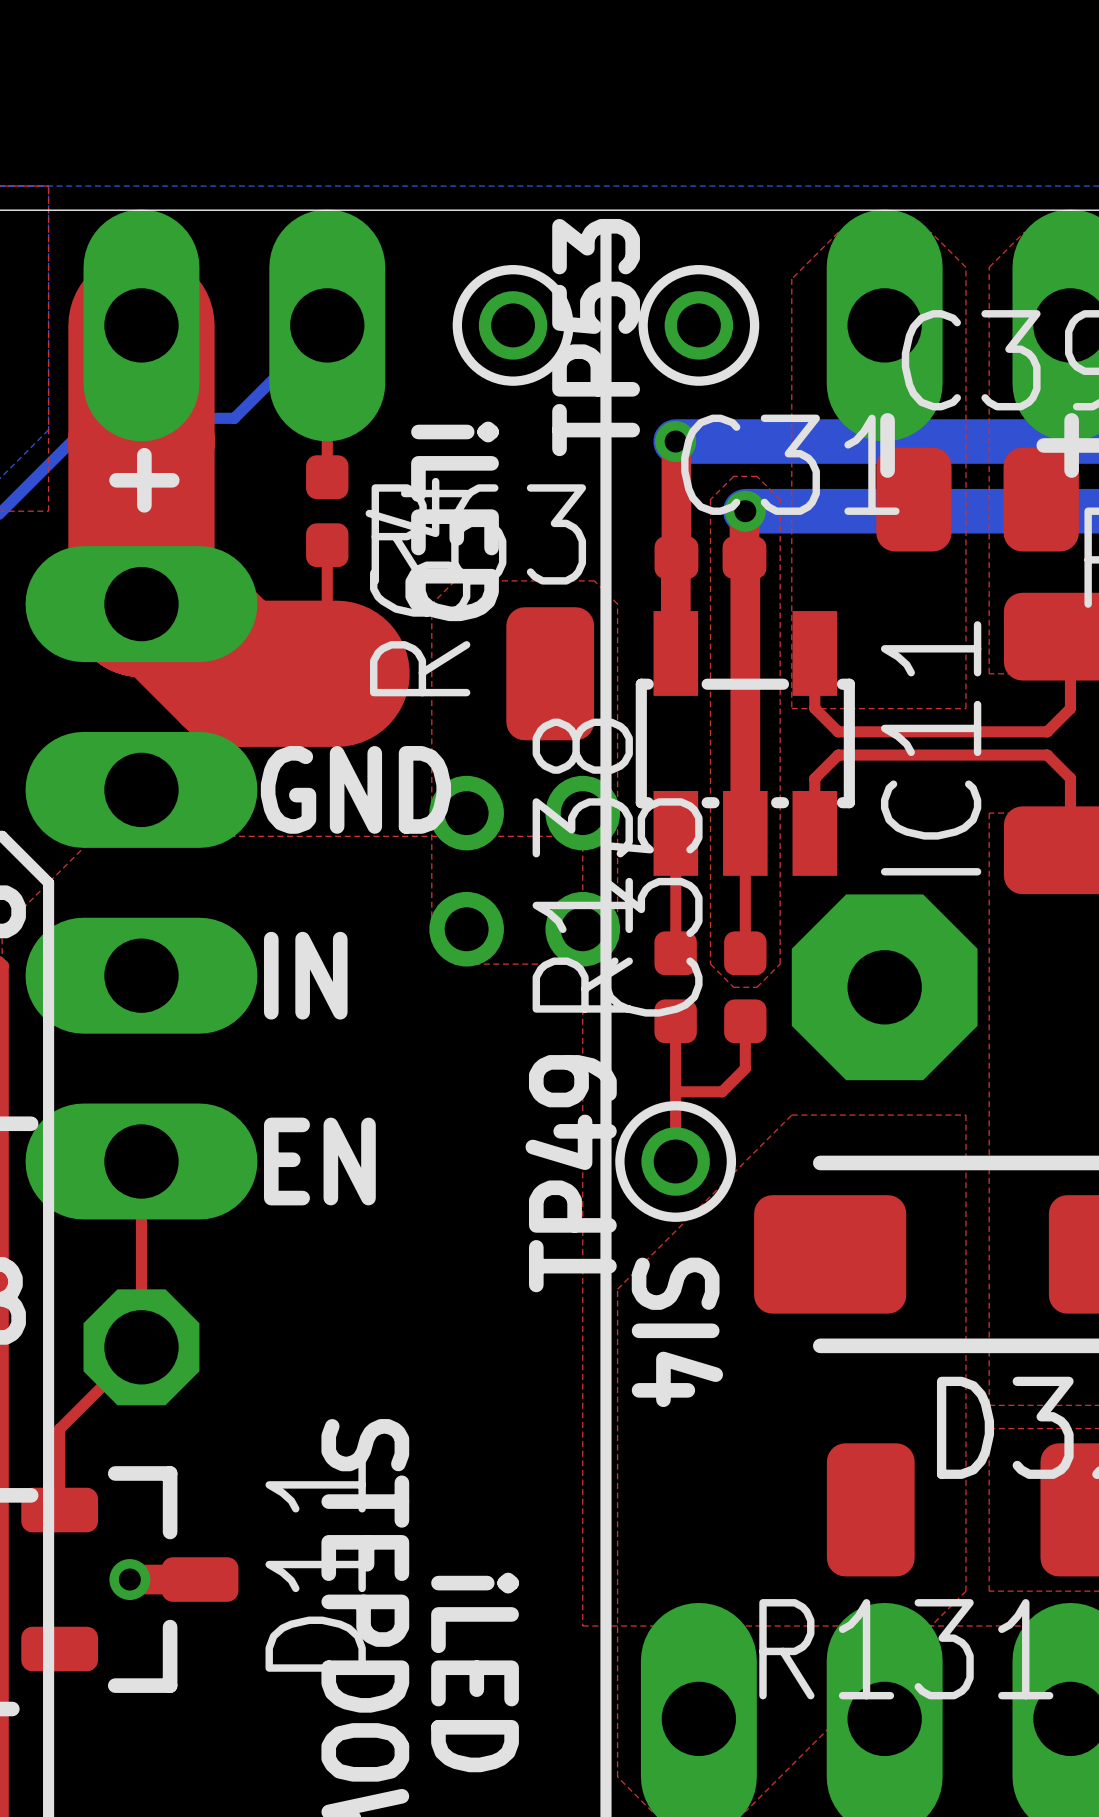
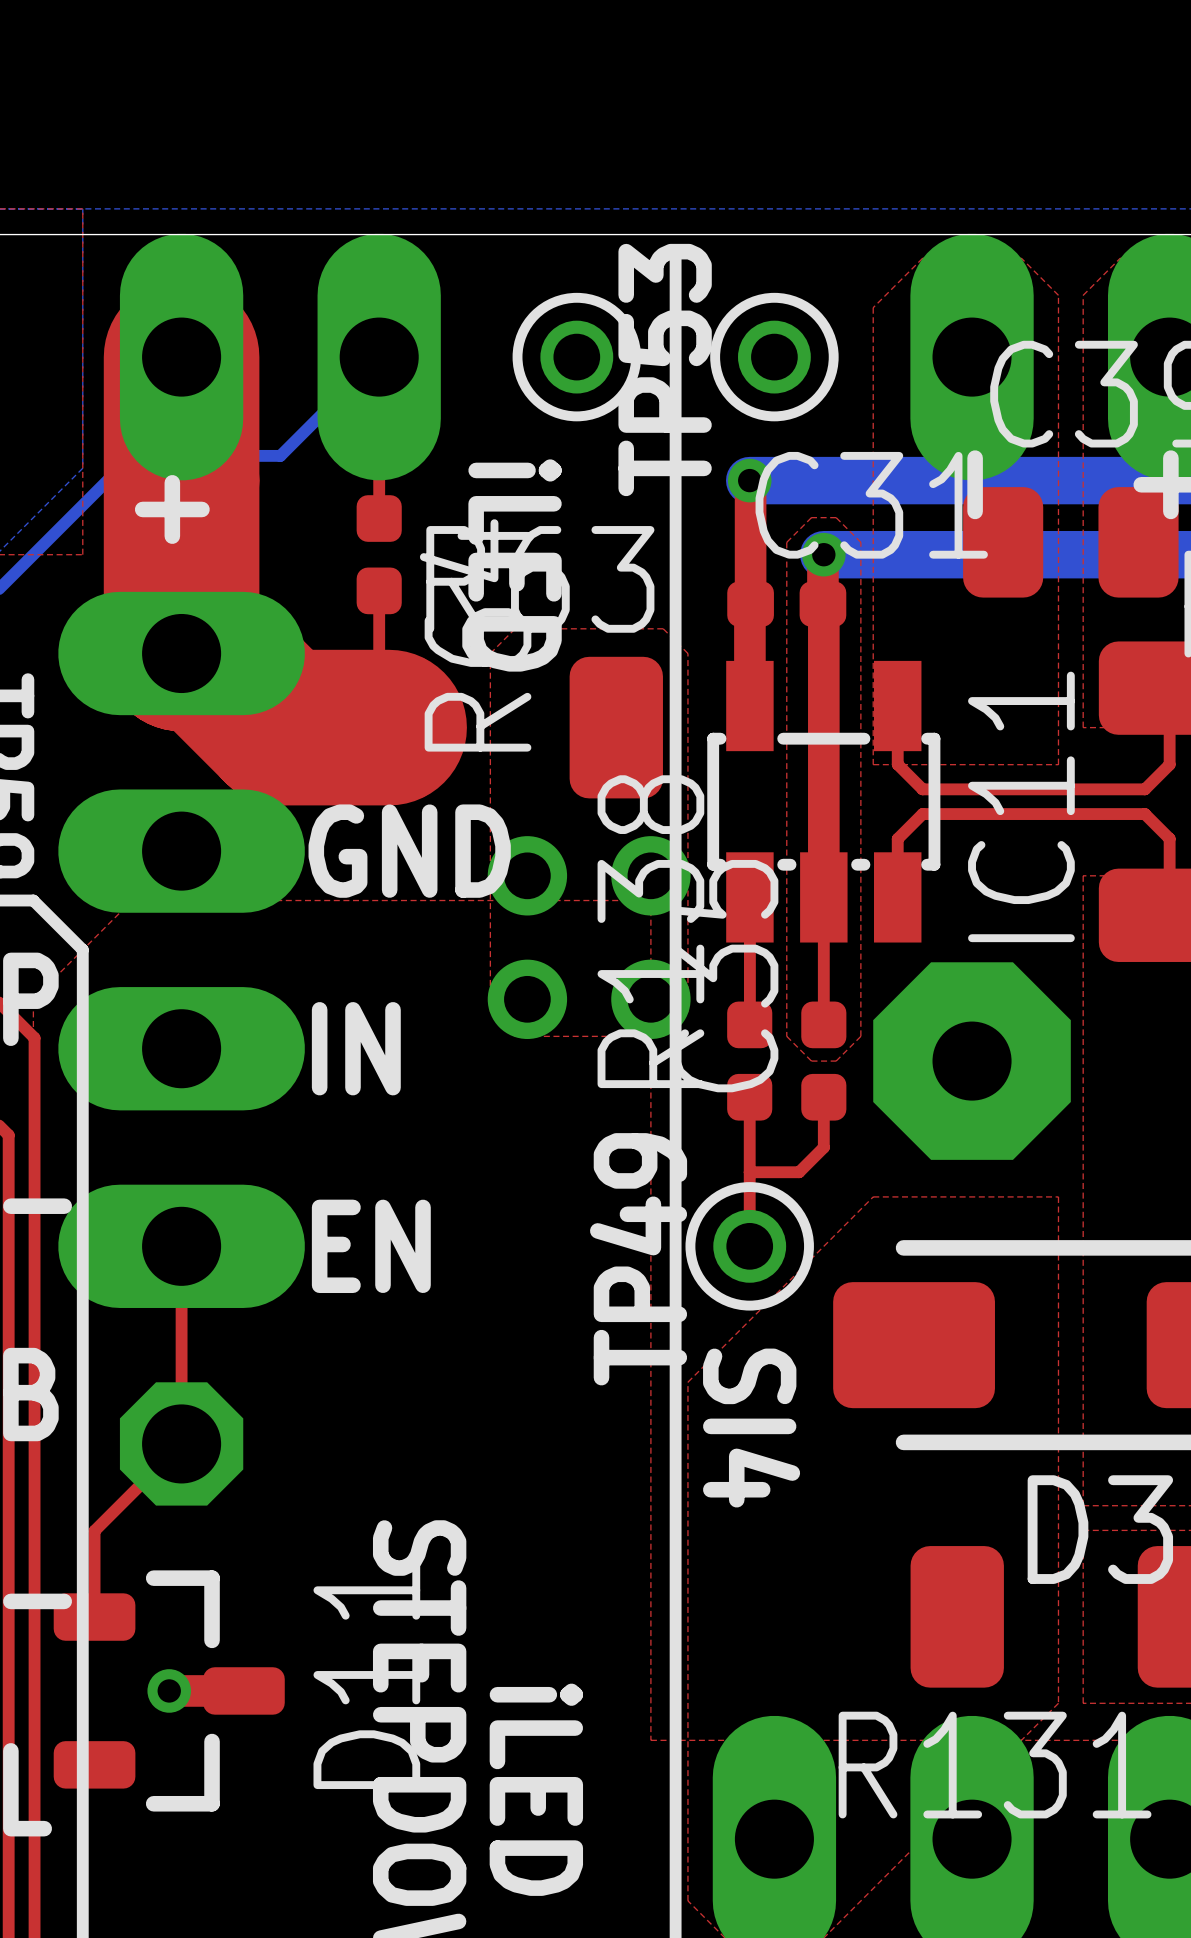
text position: + (144, 480) -> + (172, 509)

